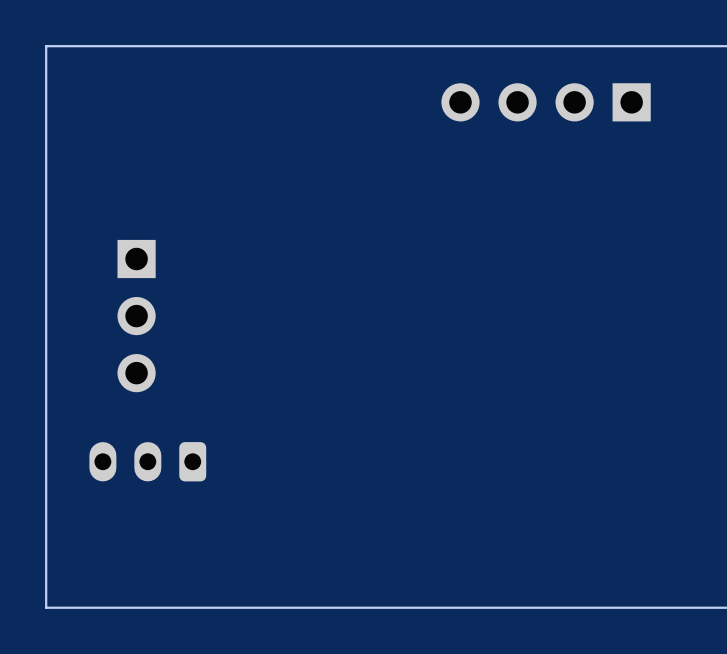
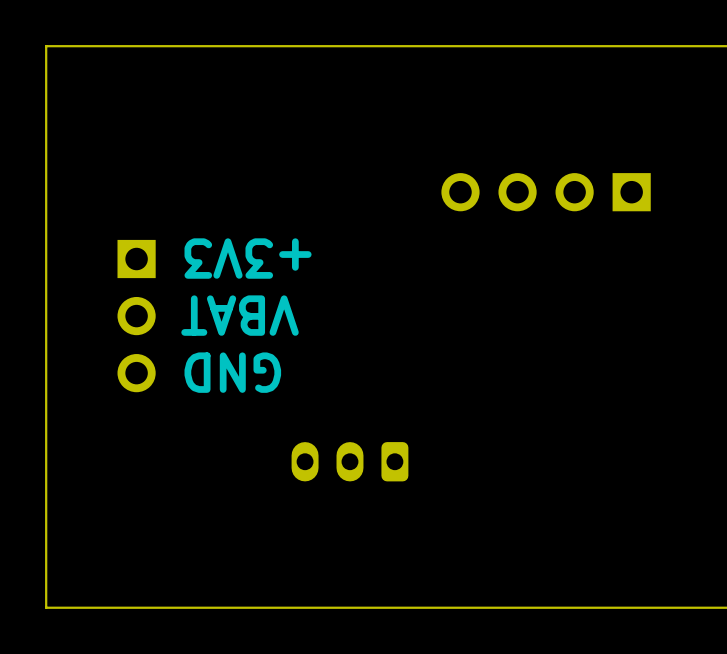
part position: (546, 102) -> (546, 192)
text: none -> +3V3 (248, 258)
text: none -> VBAT (240, 315)
text: none -> GND (232, 372)
part position: (147, 461) -> (349, 461)

